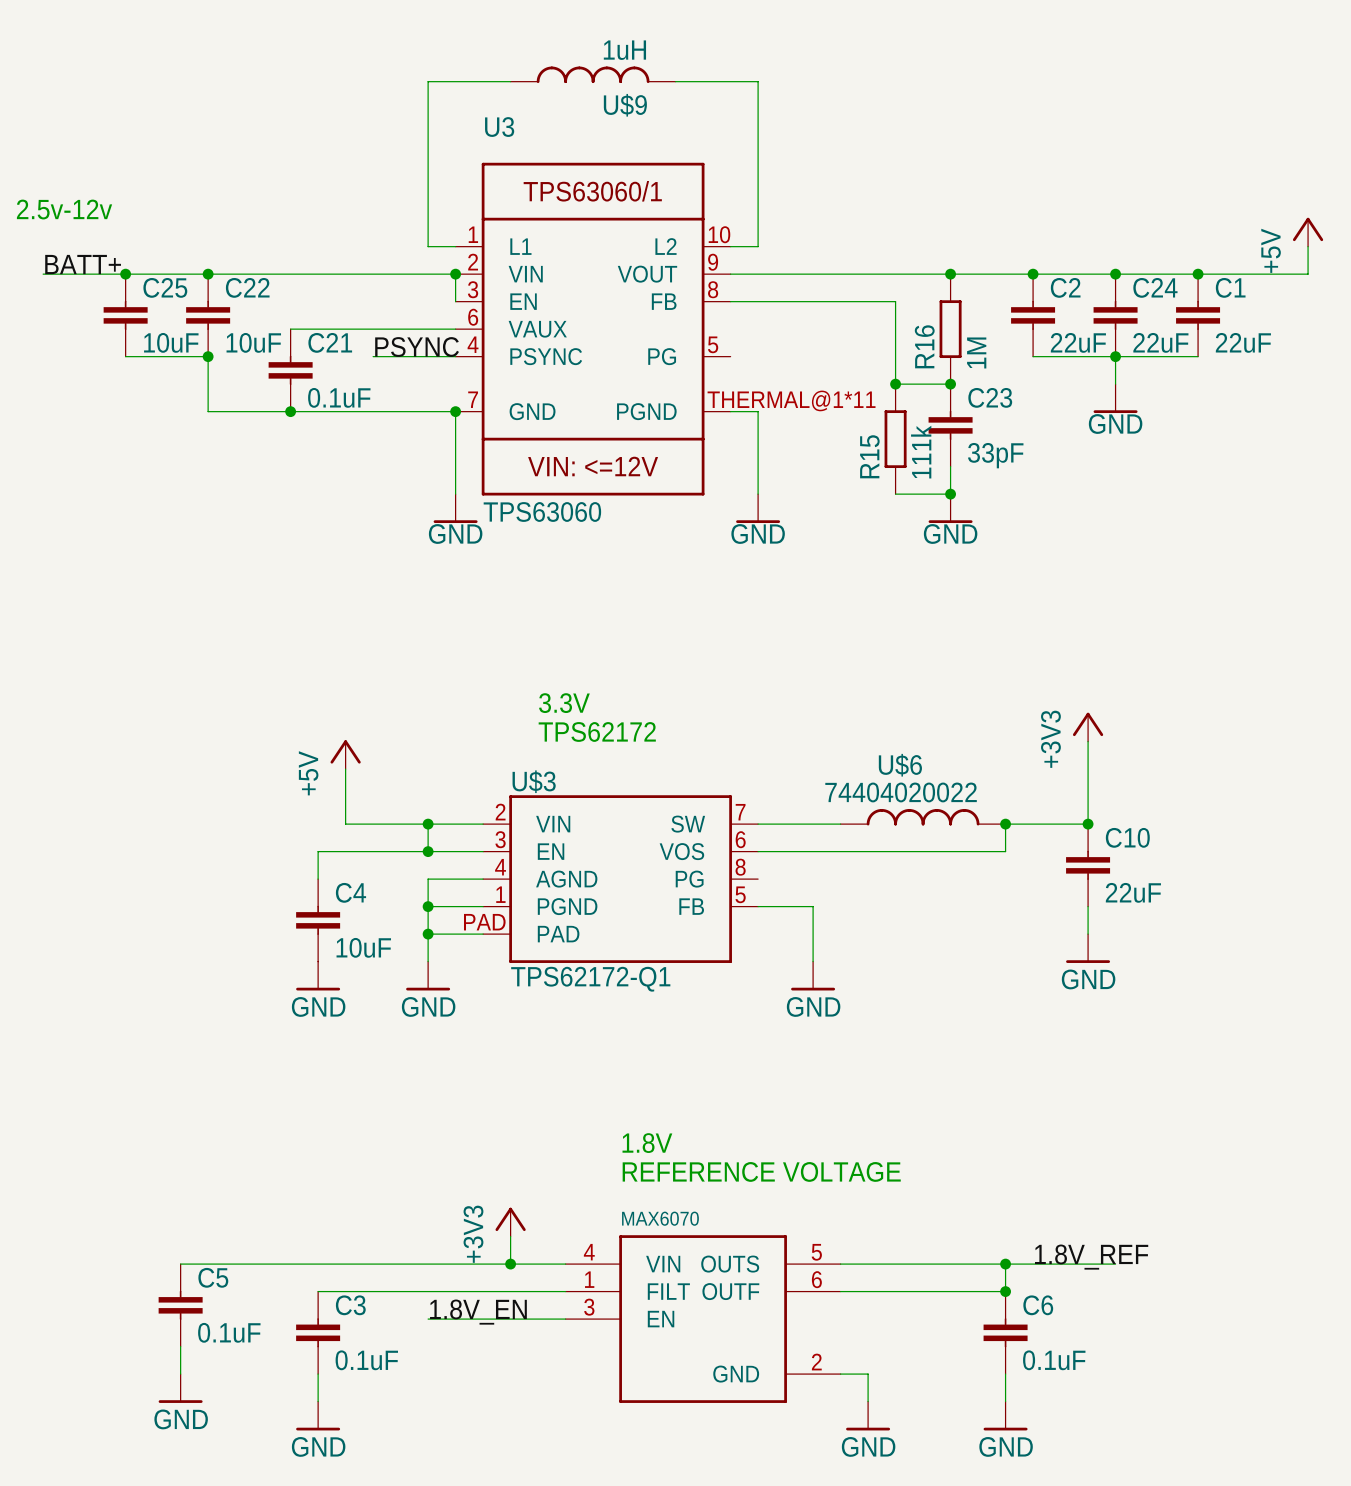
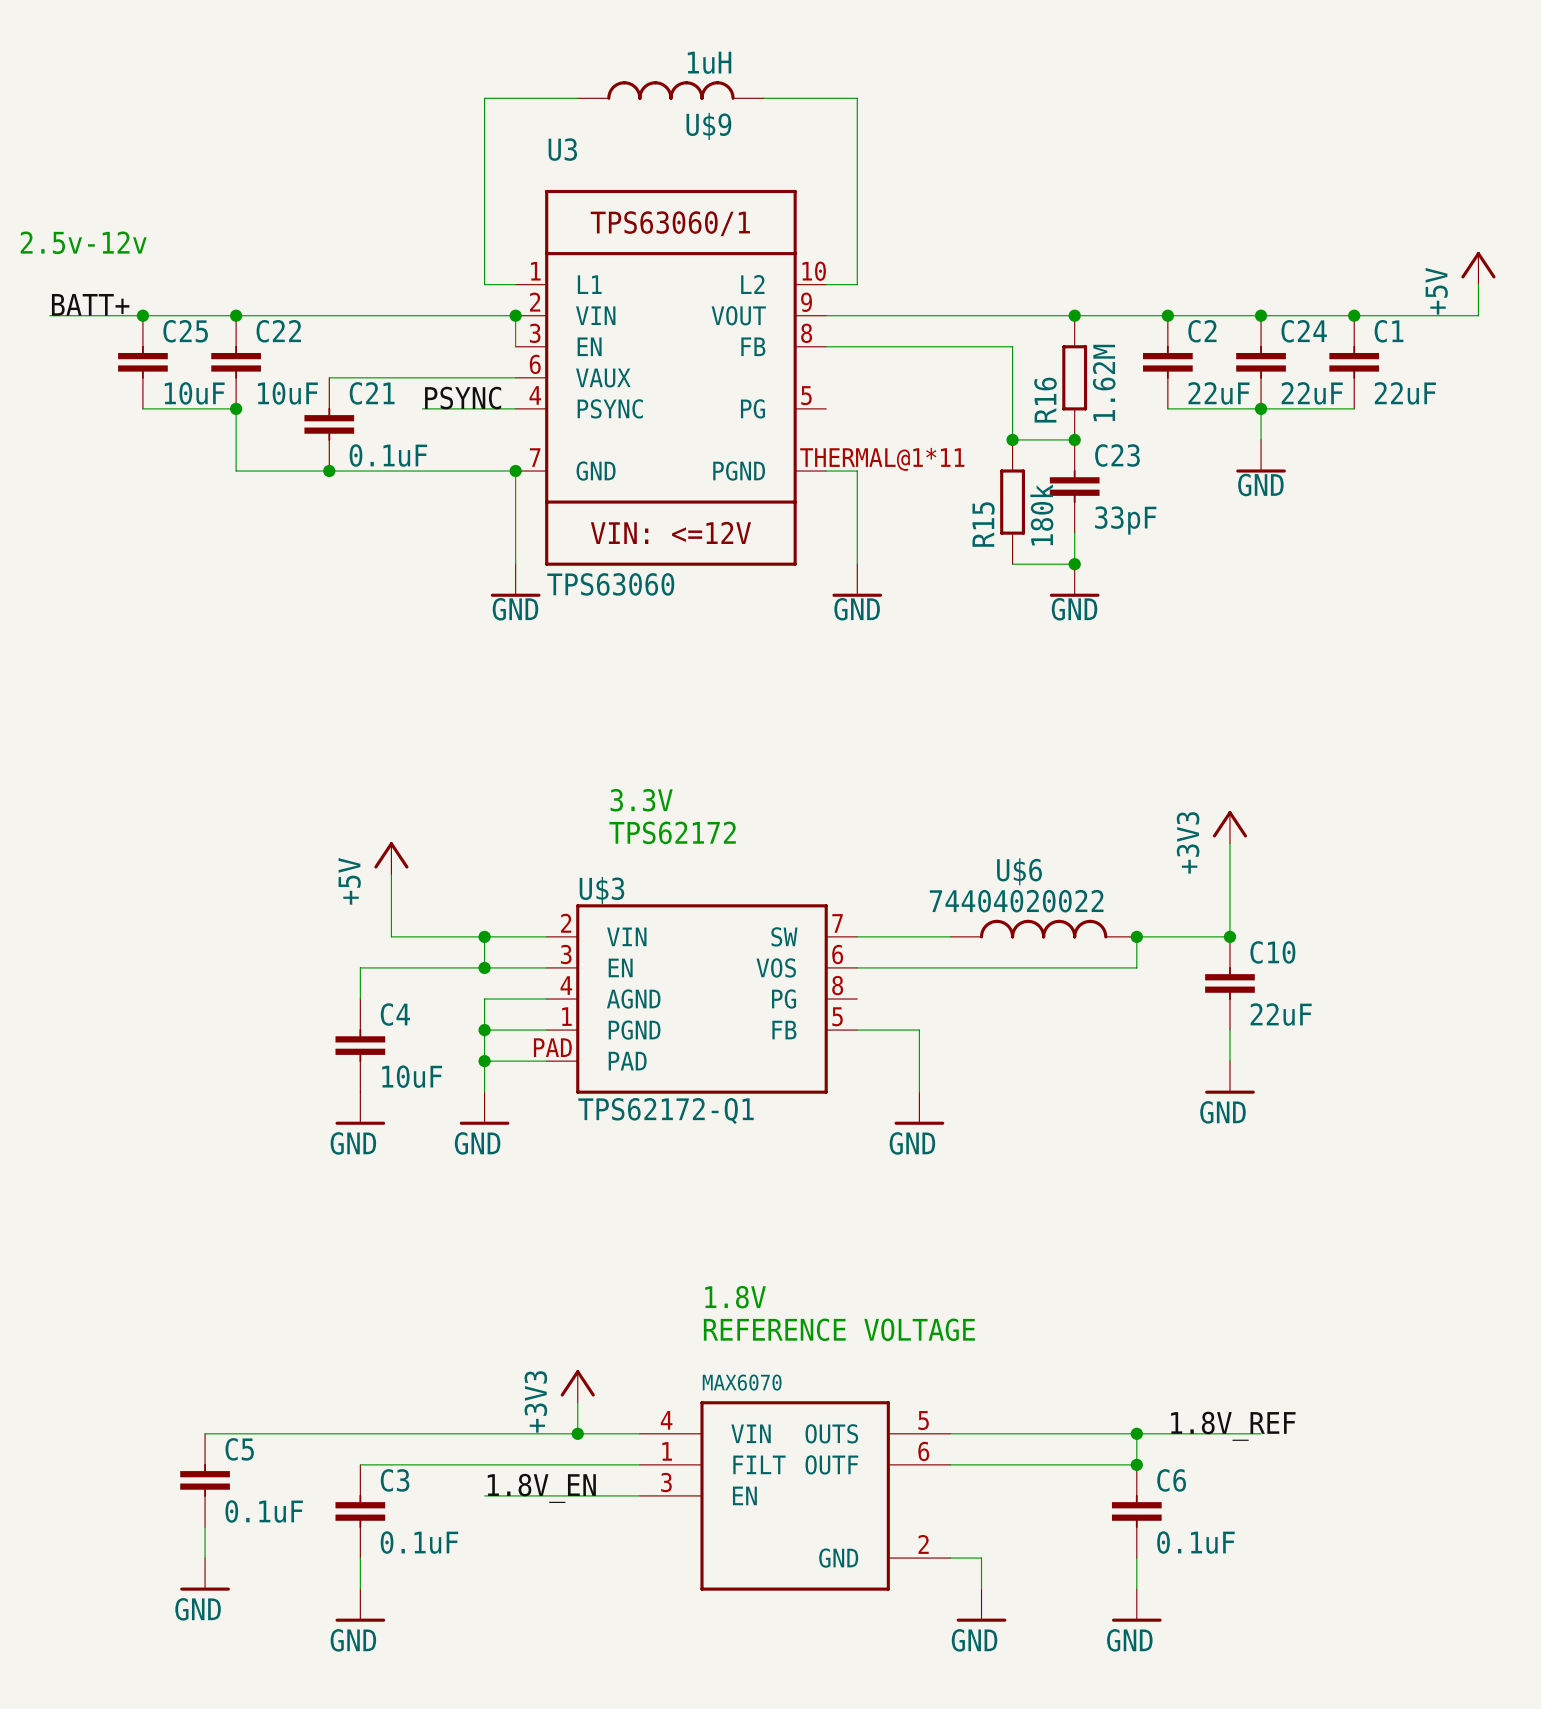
R16 value: 1M (976, 352) -> 1.62M (1104, 382)
R15 value: 111k (921, 452) -> 180k (1041, 514)

